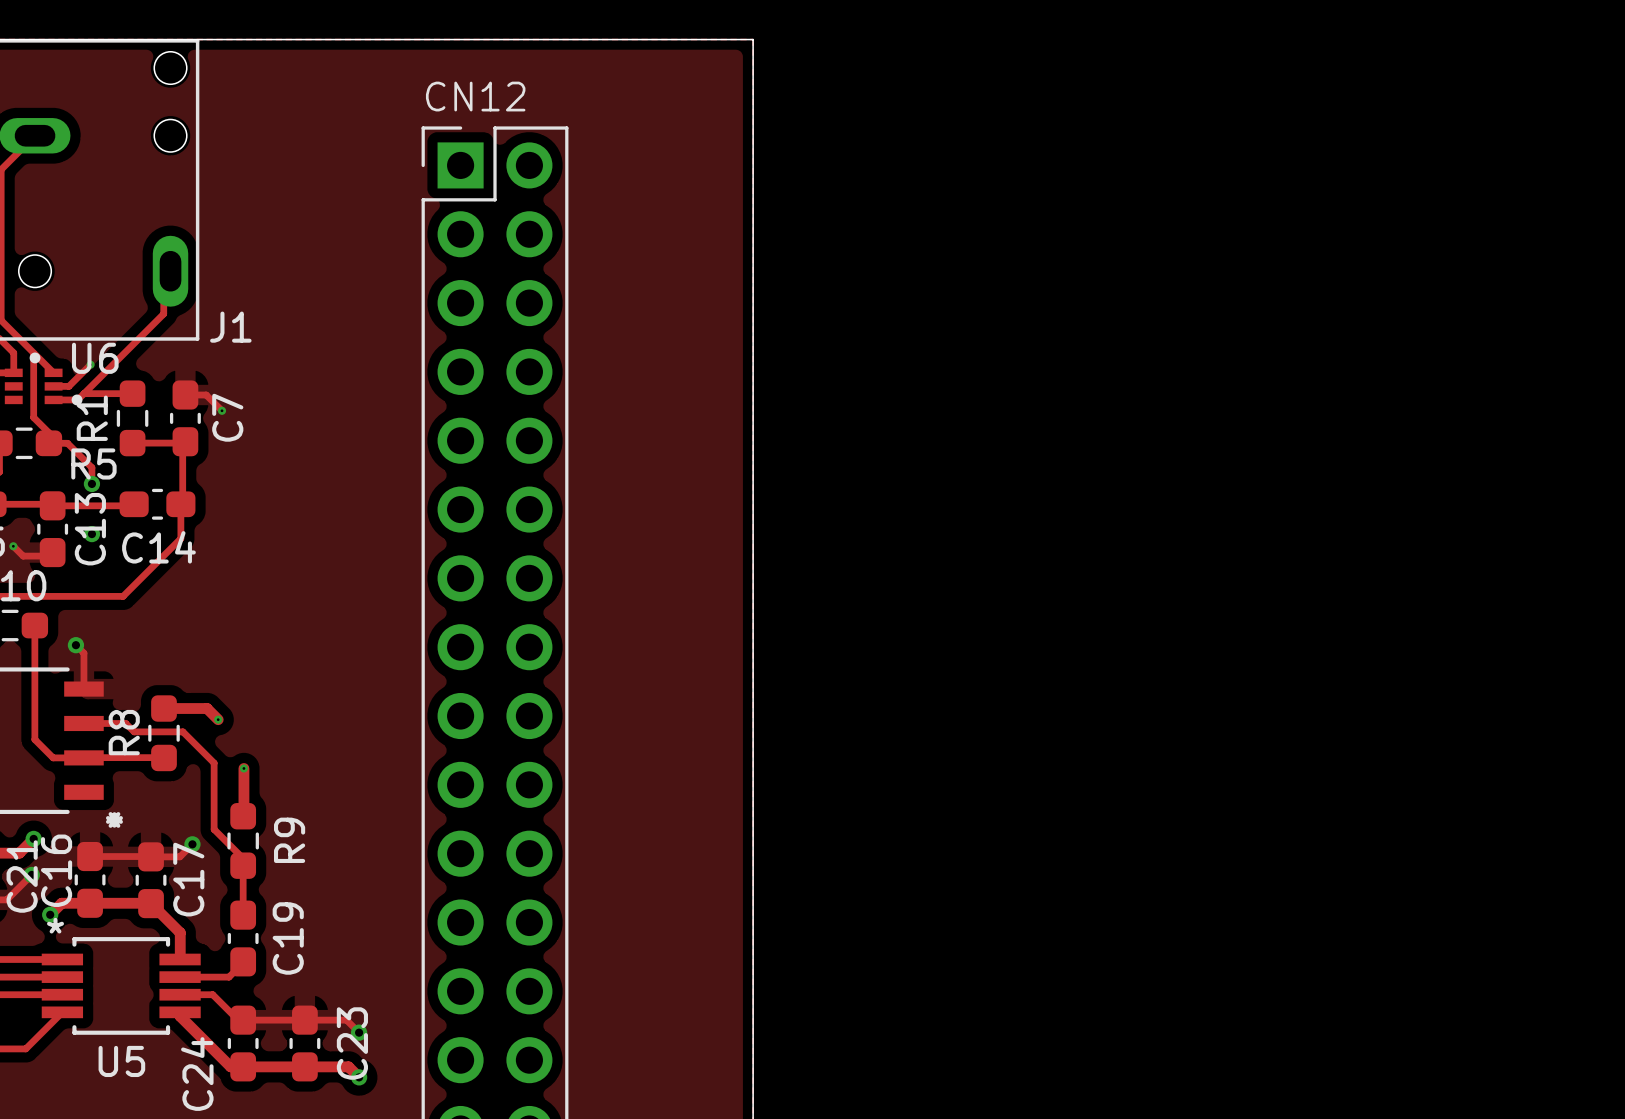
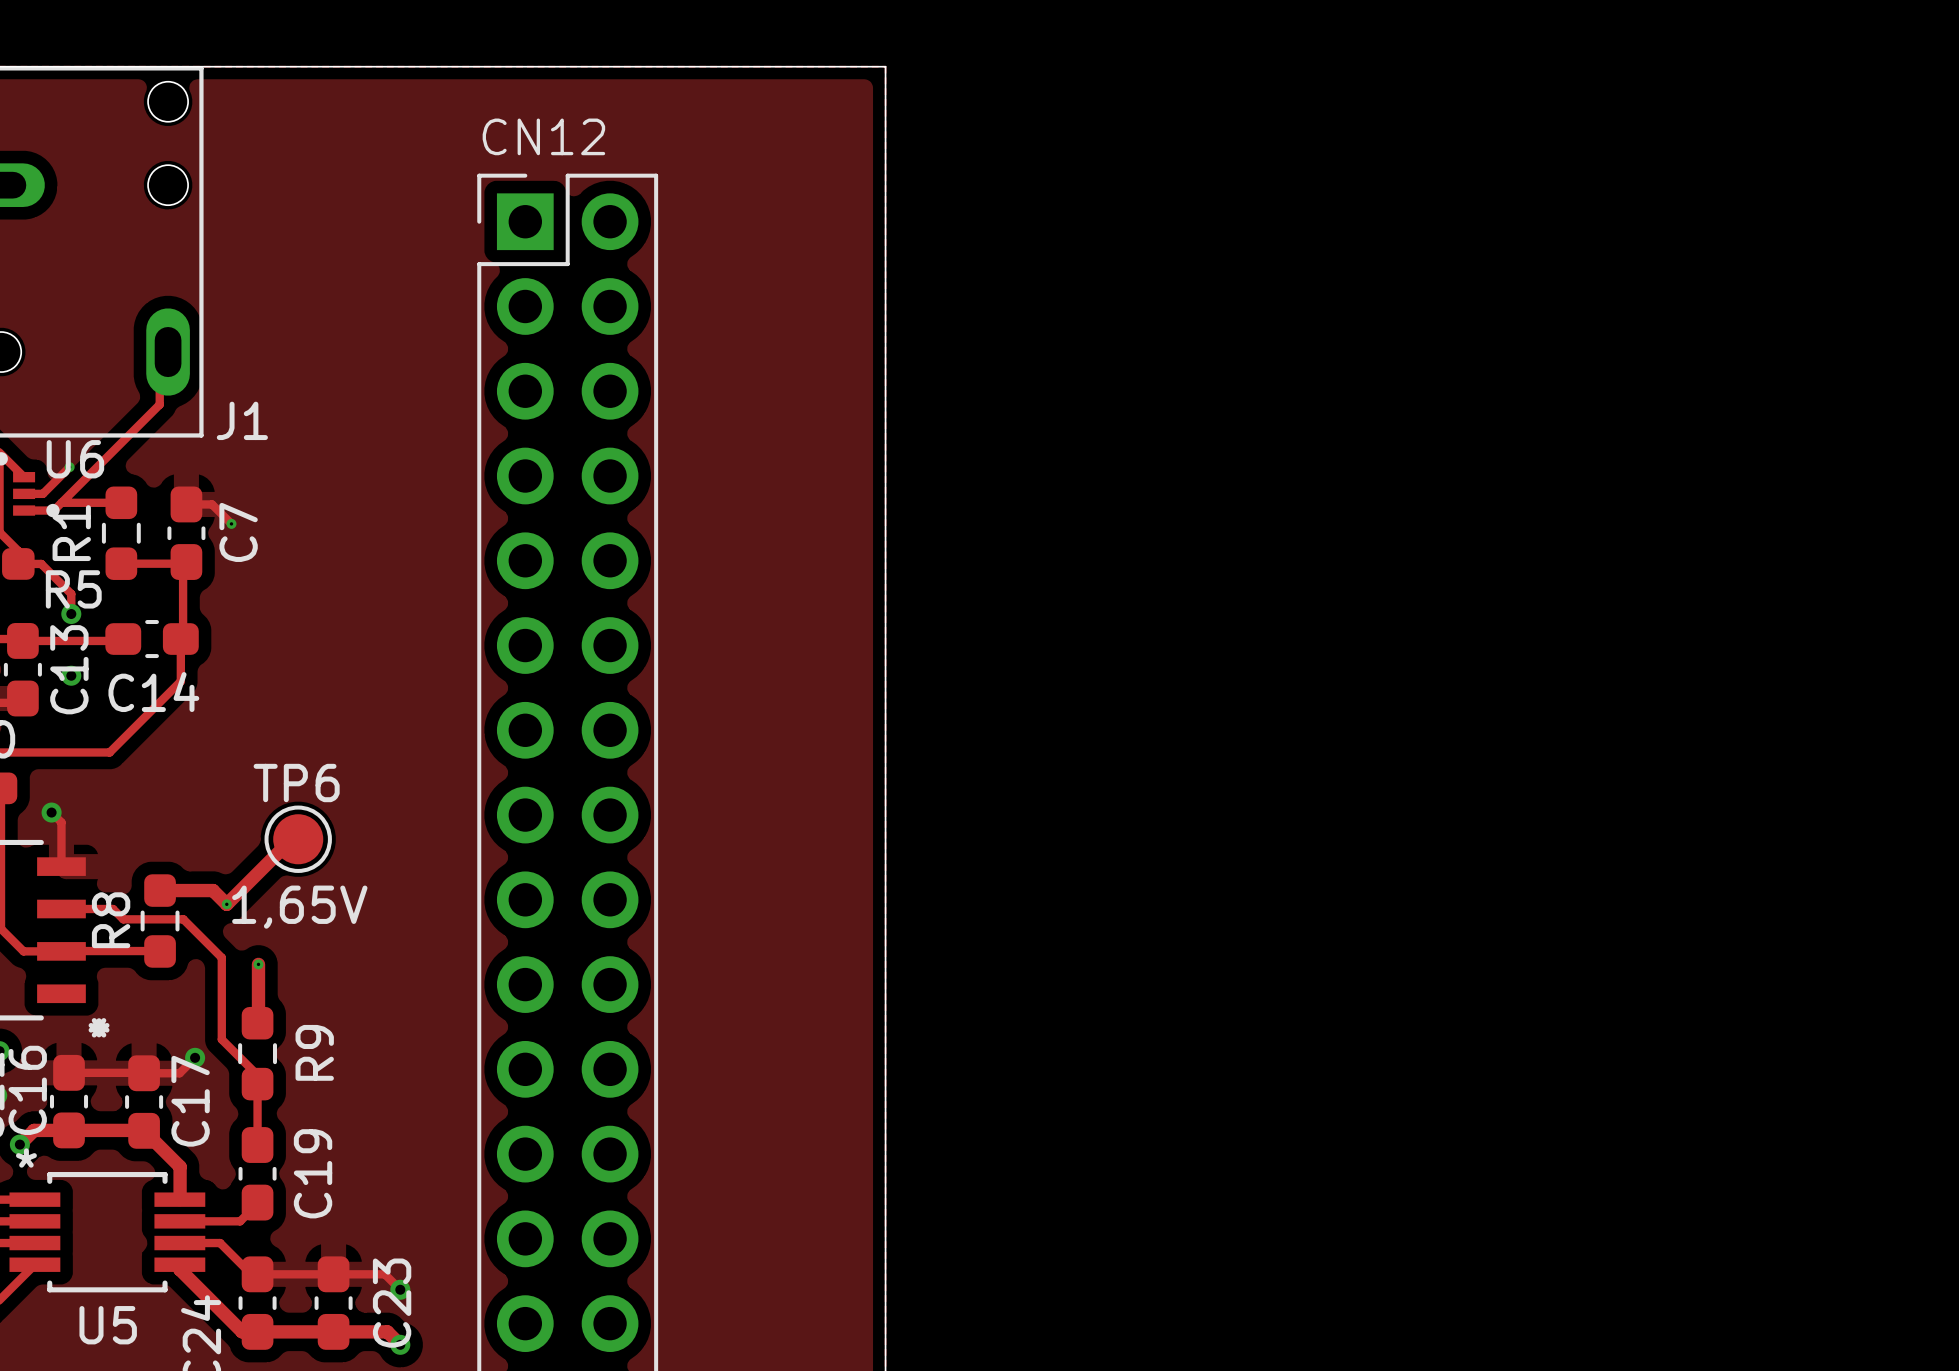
track: none -> (298, 839) (291, 839) (226, 904)
TP6: none -> 1,65V (298, 839)

